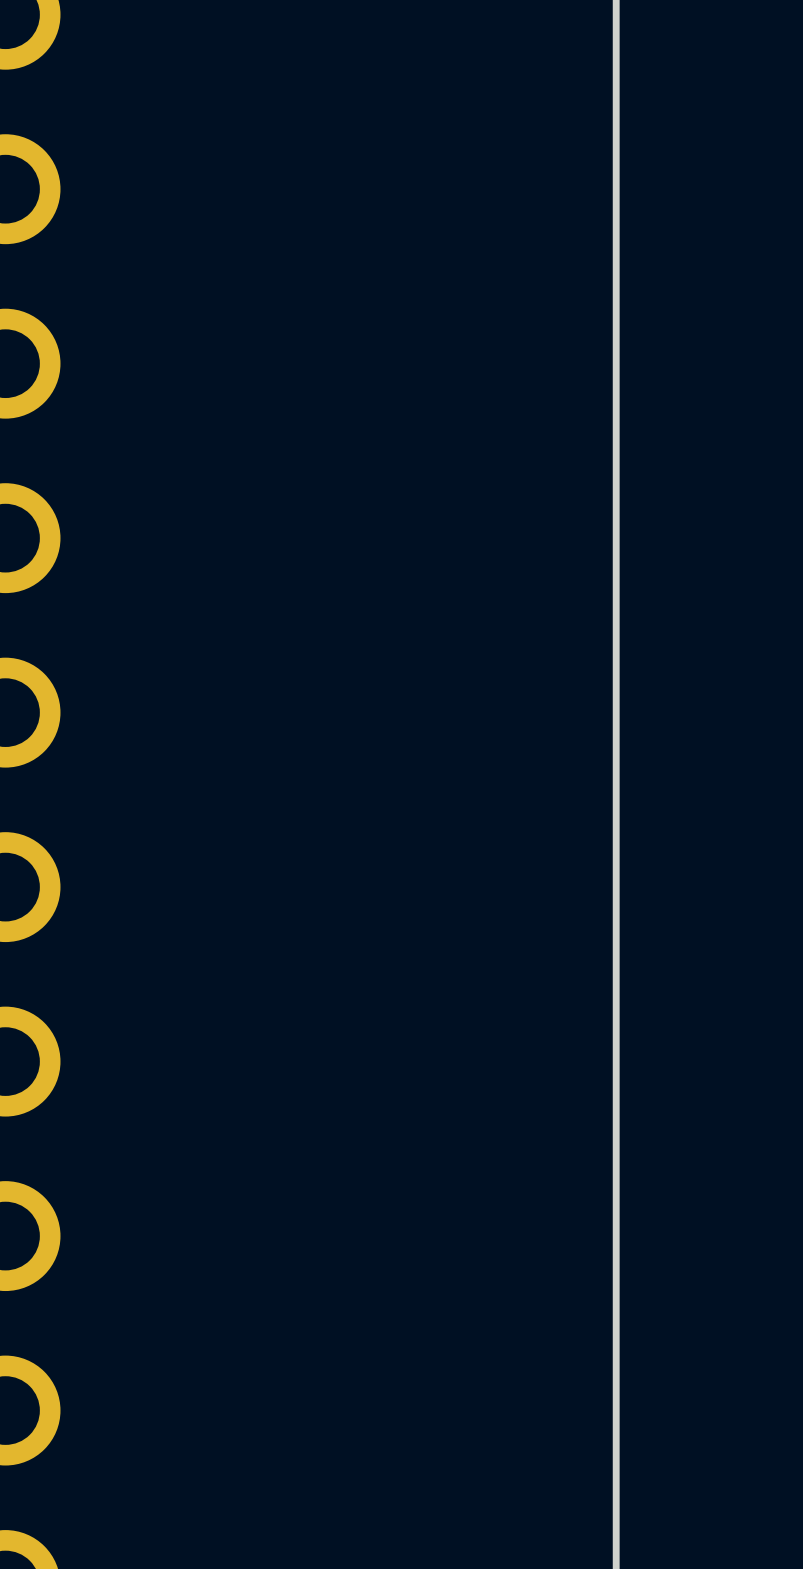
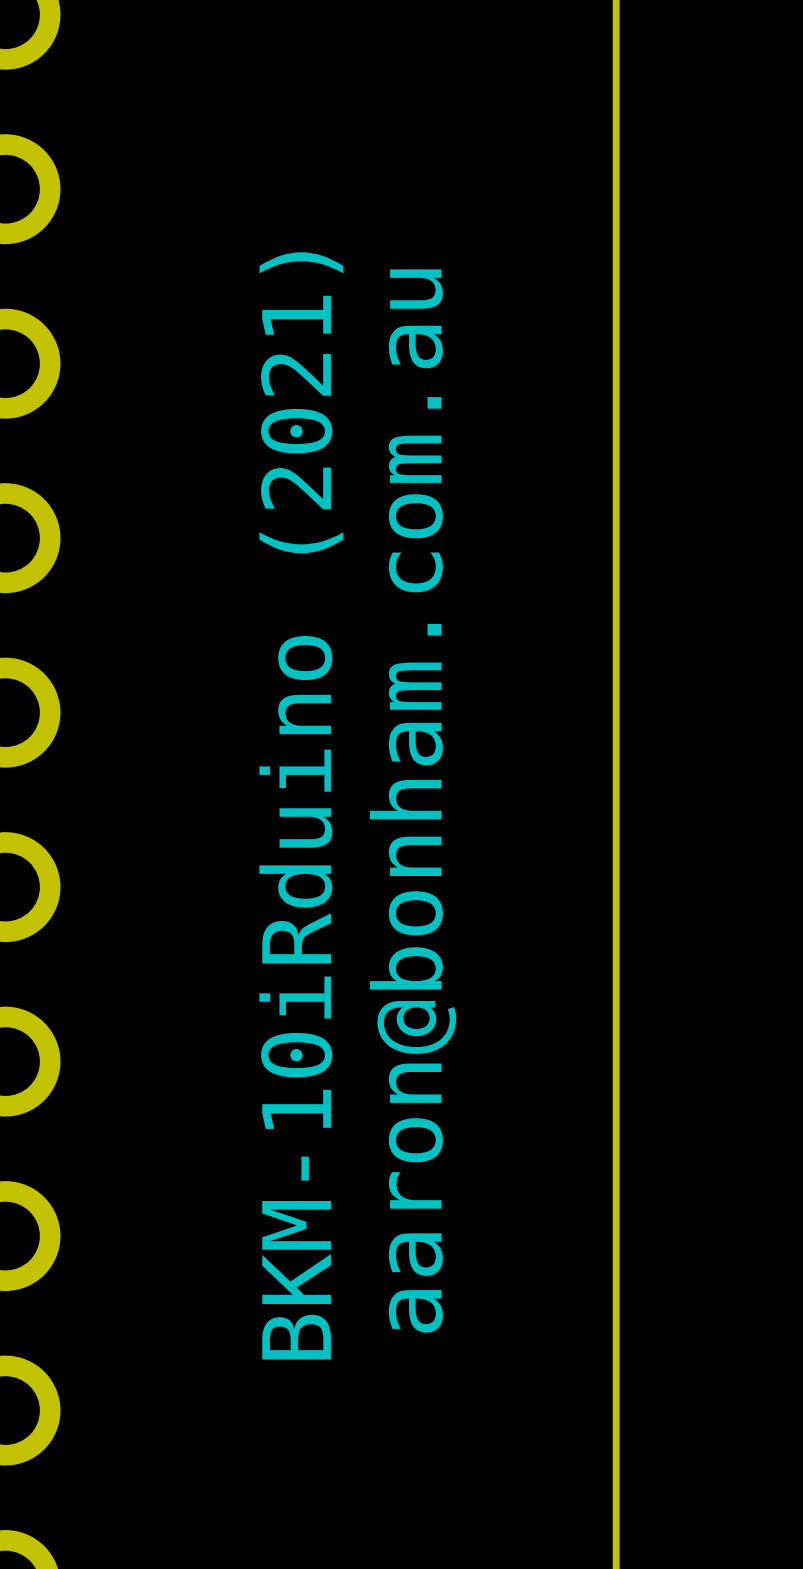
text: none -> BKM-10iRduino (2021) (301, 805)
text: none -> aaron@bonham.com.au (413, 801)

